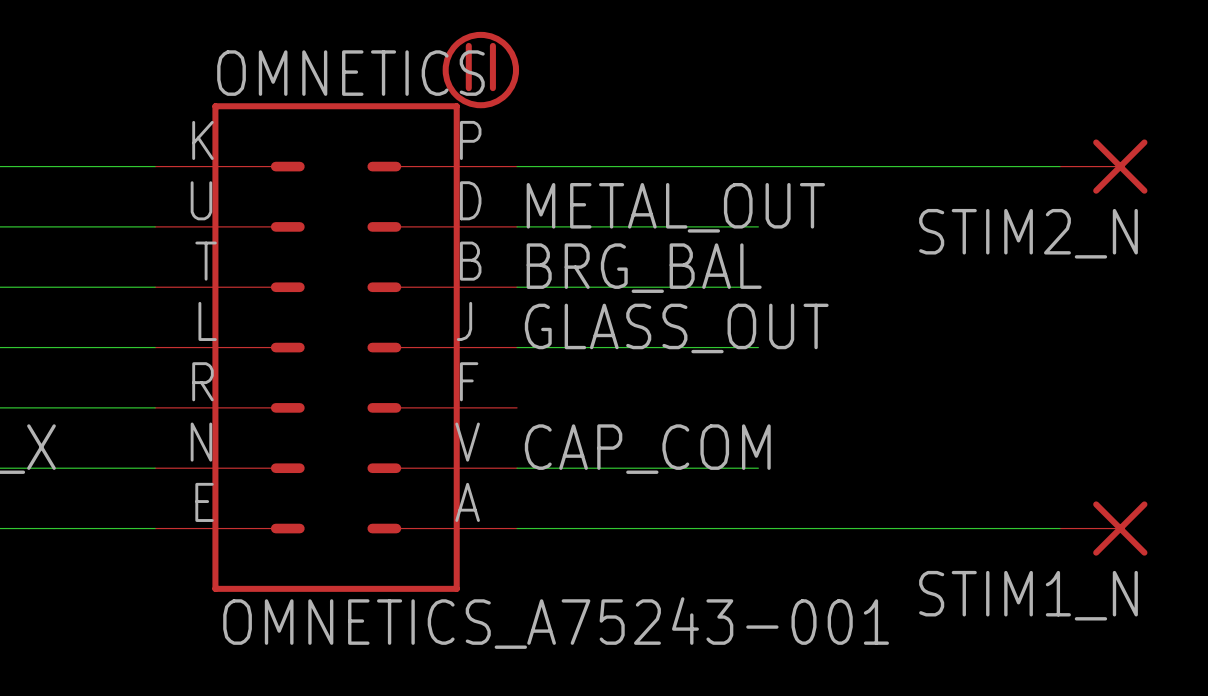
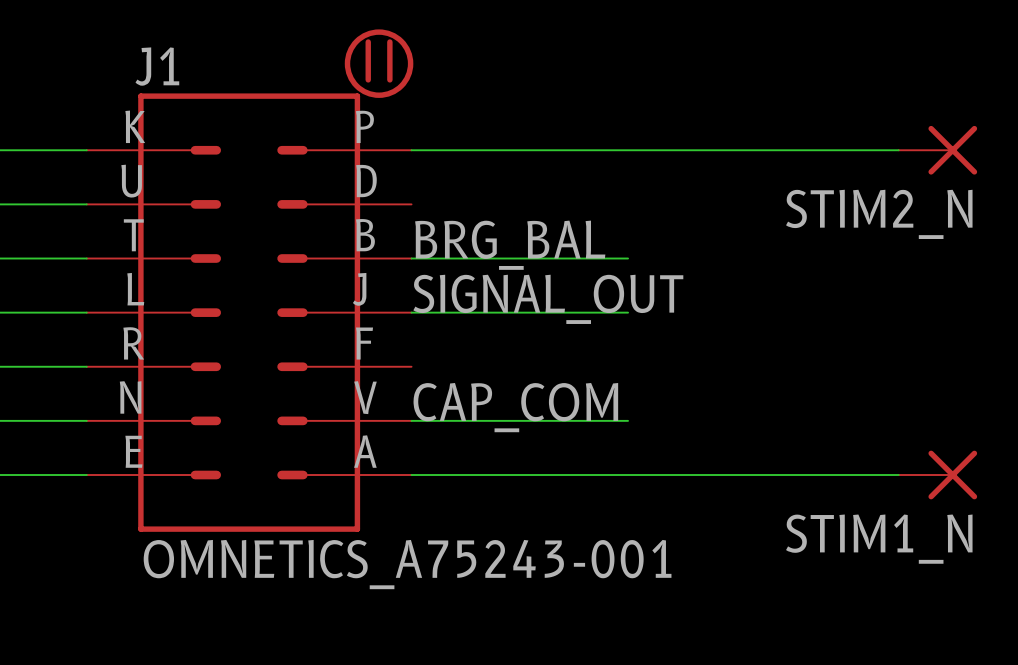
OMNETICS name: OMNETICS (350, 73) -> J1 (157, 66)
label: METAL_OUT (675, 207) -> none
wire: (517, 226) (758, 226) -> none
label: GLASS_OUT (676, 328) -> SIGNAL_OUT (548, 299)

